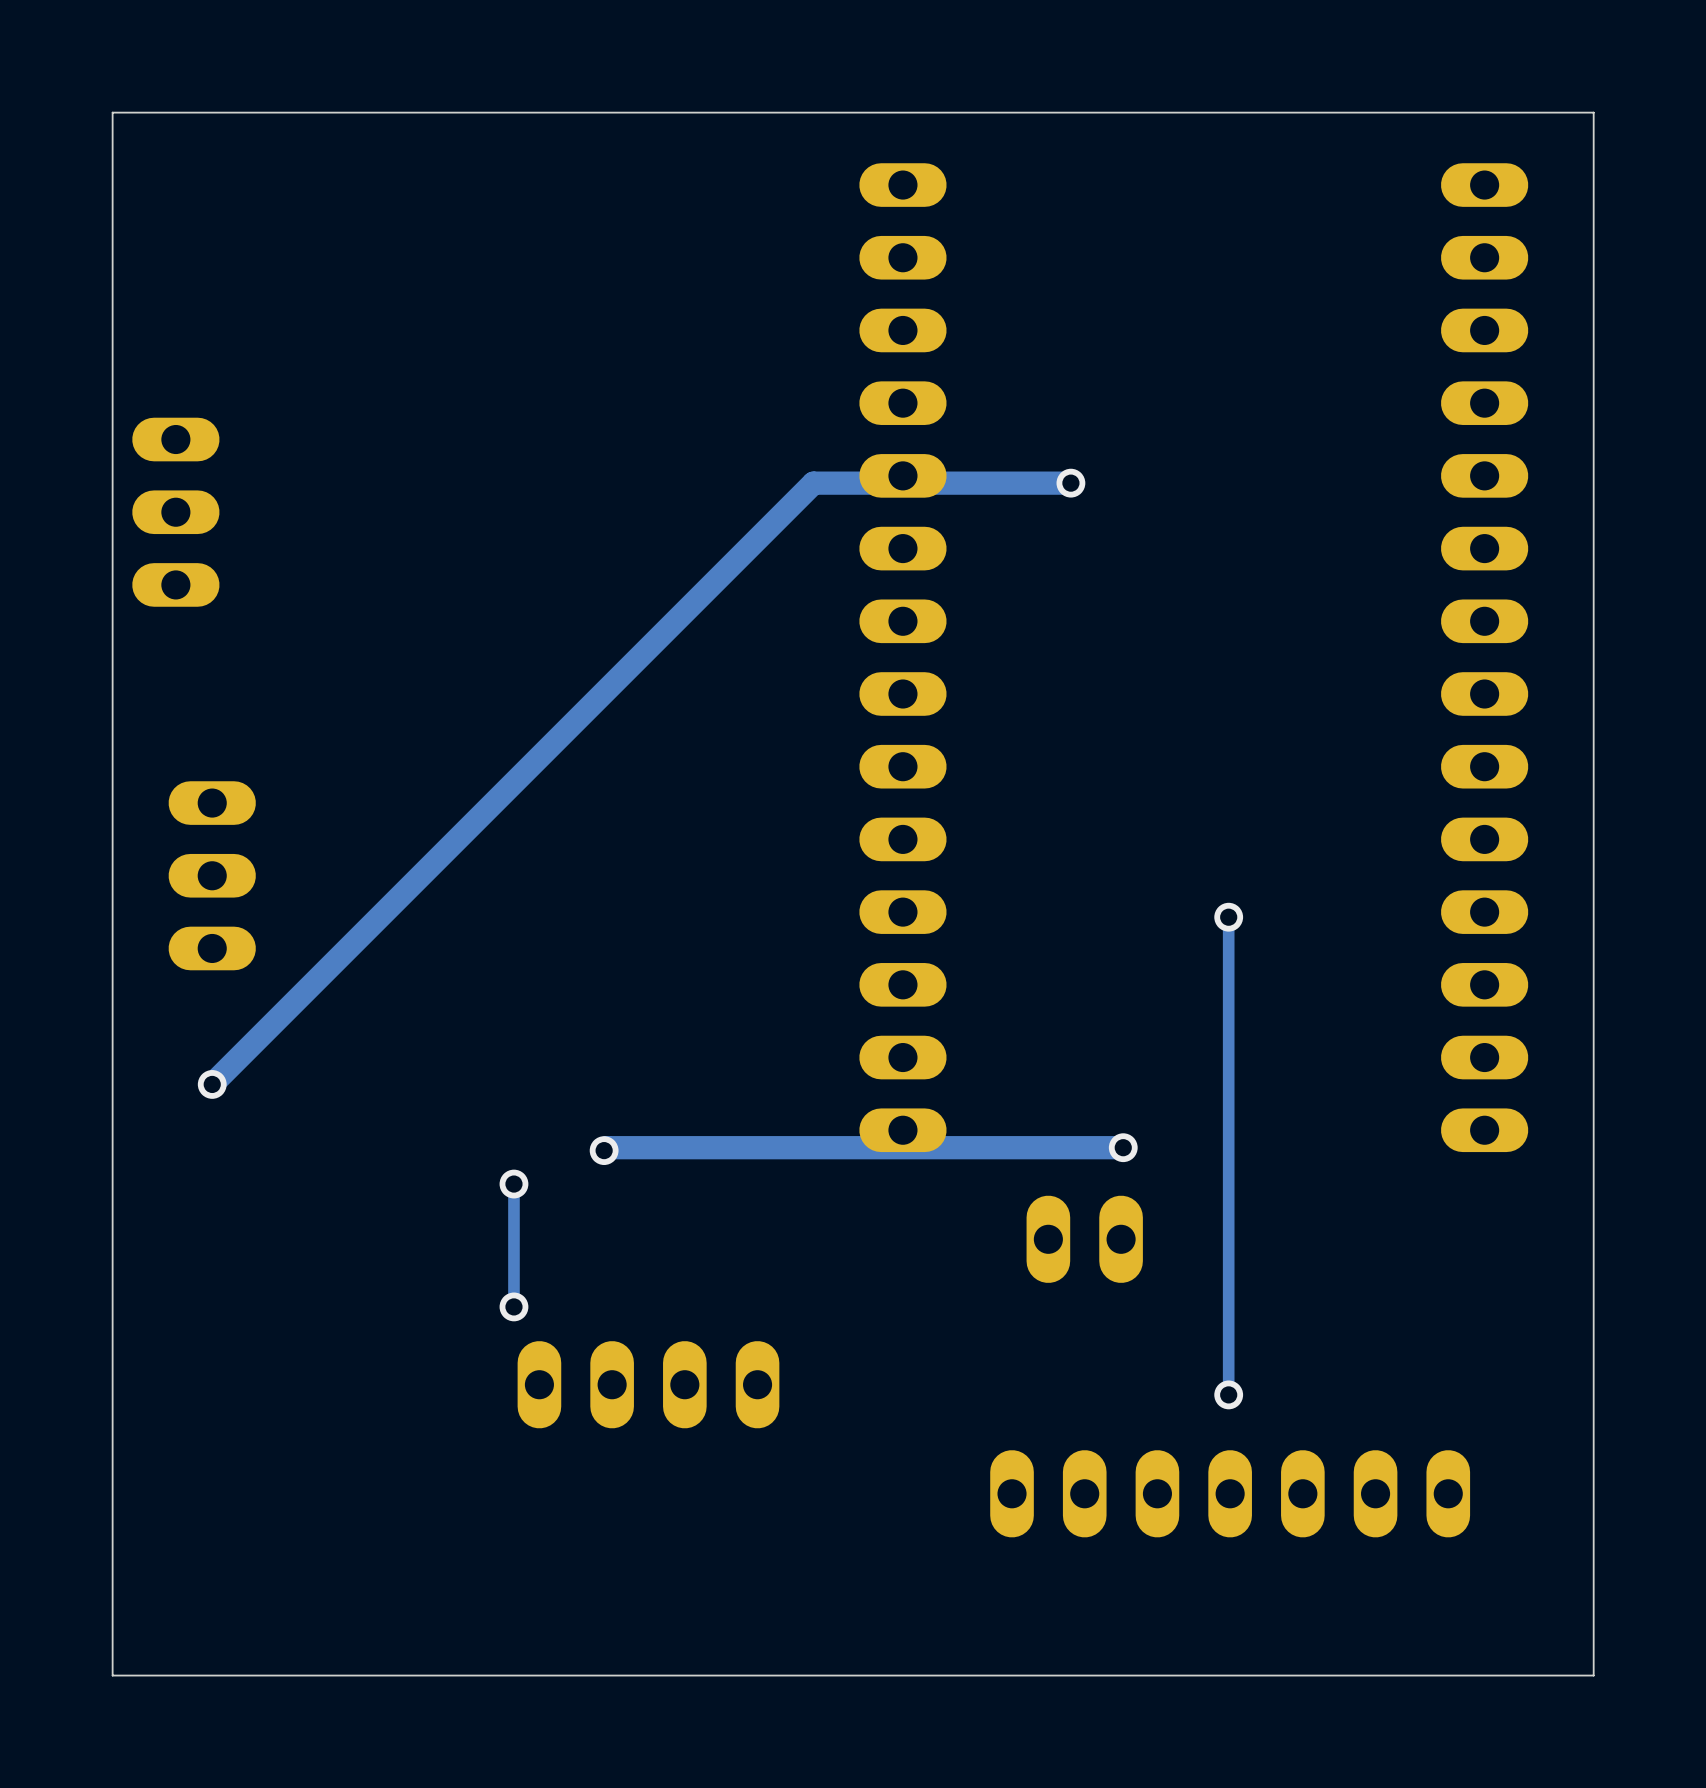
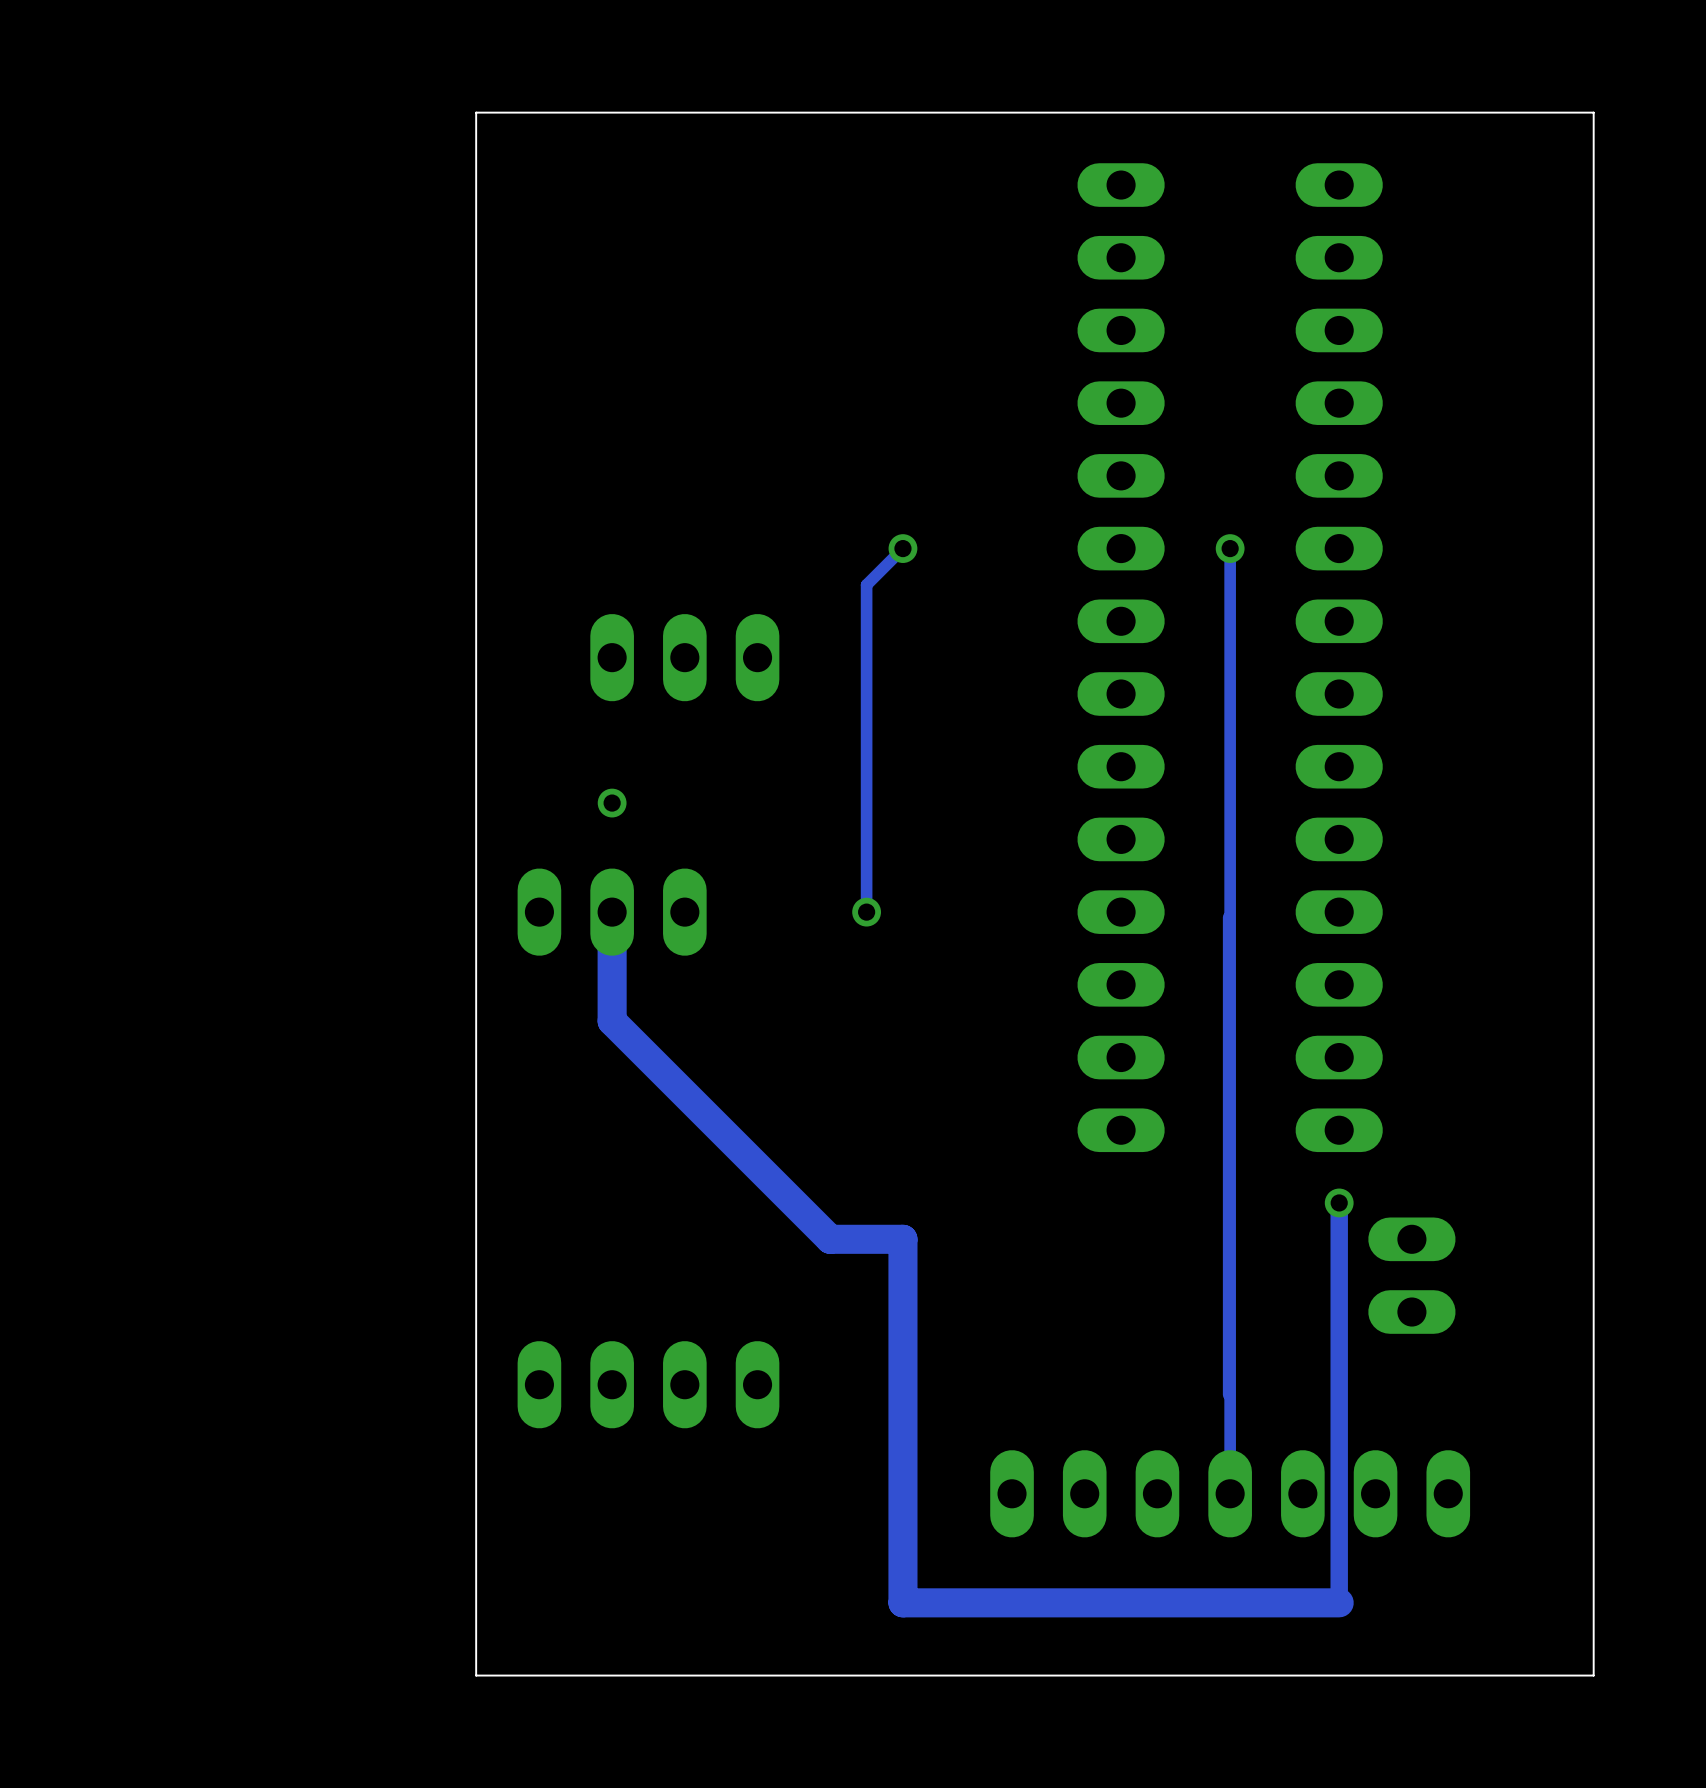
board edge: (476, 112) (112, 112) (112, 1675) (476, 1675) -> (476, 112) (476, 1675)
track: (1070, 483) (813, 483) (212, 1084) -> none
via: (1070, 483) -> none
part: (175, 512) -> none
track: none -> (902, 548) (866, 584) (866, 912)
via: none -> (902, 548)
track: none -> (1230, 548) (1230, 1493)
via: none -> (1230, 548)
part: none -> (684, 657)
part: (902, 657) -> none
part: none -> (1121, 657)
part position: (1484, 657) -> (1339, 657)
via: none -> (612, 803)
part: (212, 875) -> none
track: none -> (612, 912) (612, 1021) (830, 1239) (902, 1239) (902, 1602) (1339, 1602) (1339, 1202)
part: none -> (612, 912)
via: none -> (866, 912)
via: (1228, 917) -> none
via: (212, 1084) -> none
track: (1123, 1147) (607, 1147) (604, 1150) -> none
via: (1123, 1147) -> none
via: (604, 1150) -> none
track: (513, 1184) (513, 1306) -> none
via: (513, 1184) -> none
via: none -> (1339, 1202)
part rotation: 0° (1084, 1239) -> 90° clockwise (1411, 1275)
part position: (1084, 1239) -> (1411, 1275)
via: (513, 1306) -> none
via: (1228, 1394) -> none

